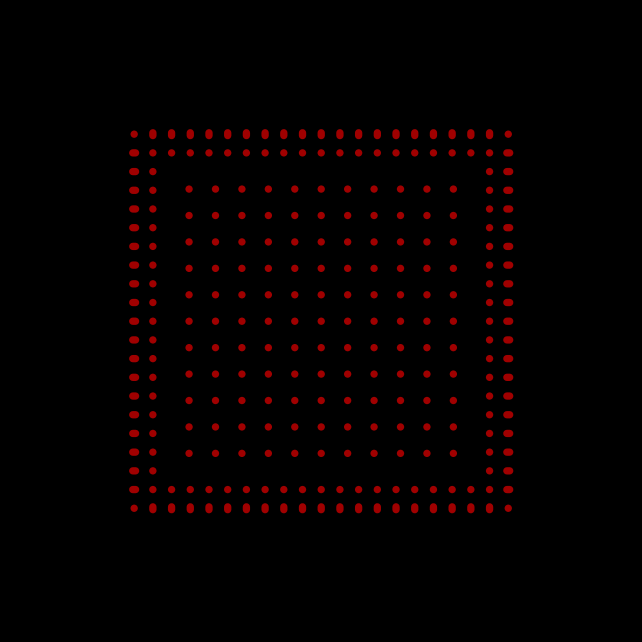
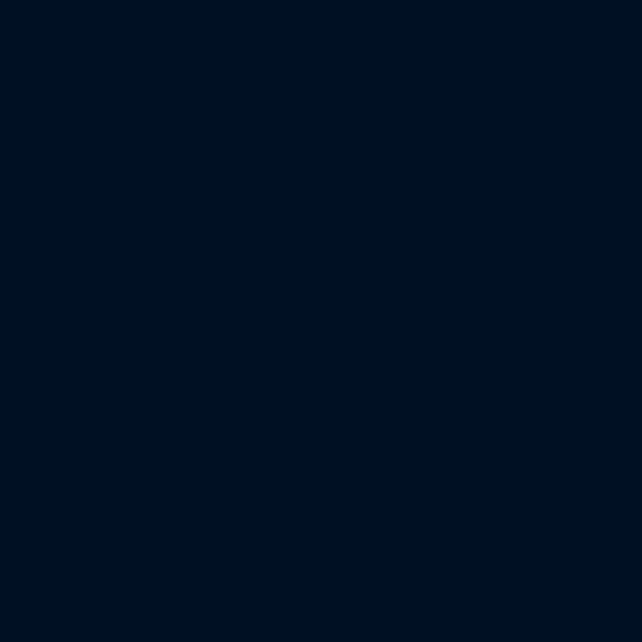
part: (321, 321) -> none

